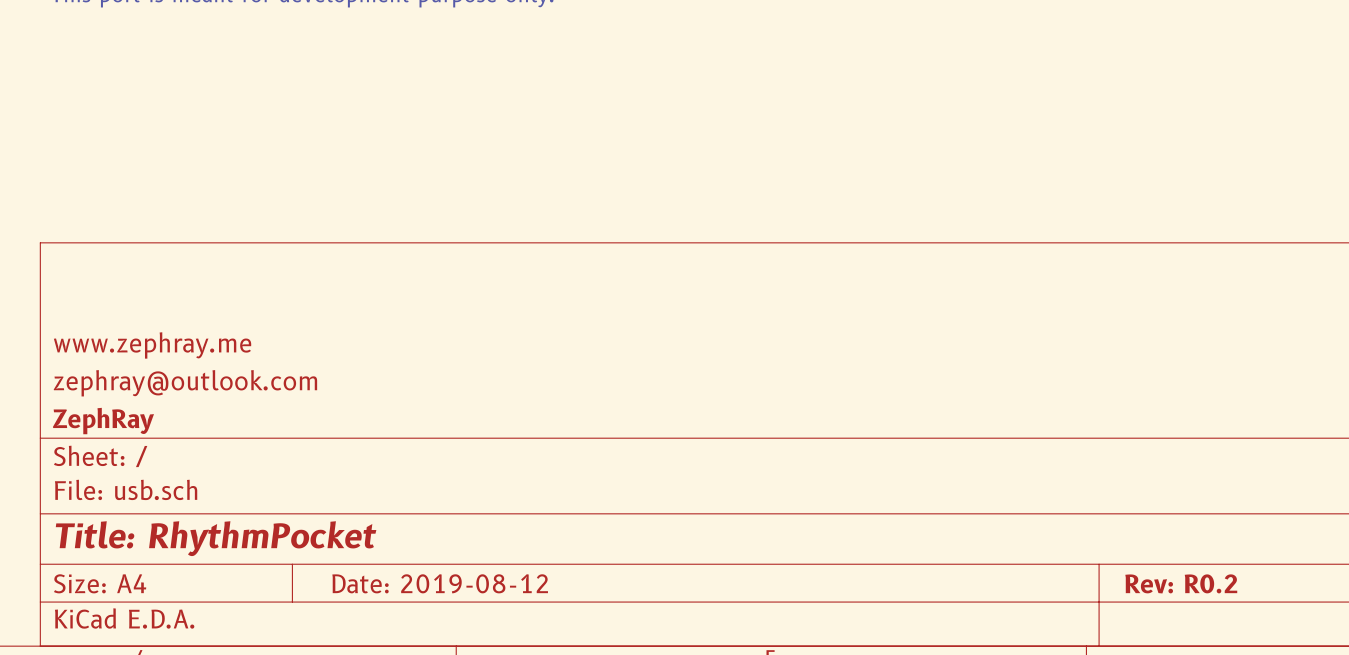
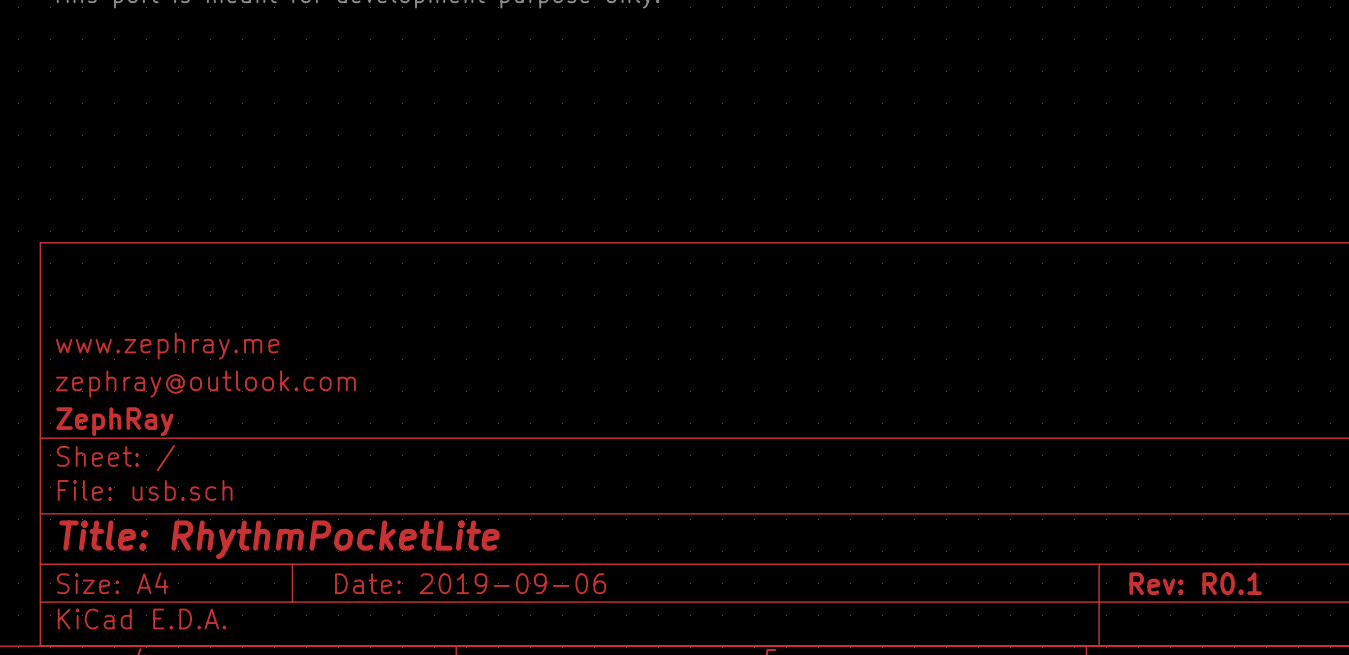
title block: Title: RhythmPocket (216, 538) -> Title: RhythmPocketLite (279, 539)
title block: Date: 2019-08-12 (440, 583) -> Date: 2019-09-06 (470, 583)
title block: Rev: R0.2 (1181, 583) -> Rev: R0.1 (1195, 583)

